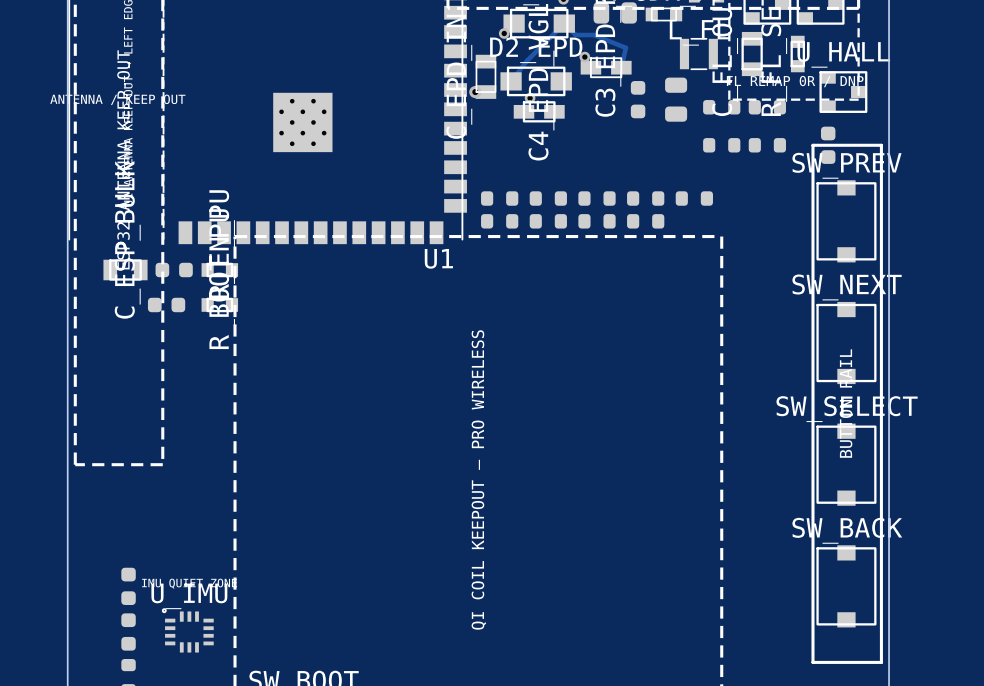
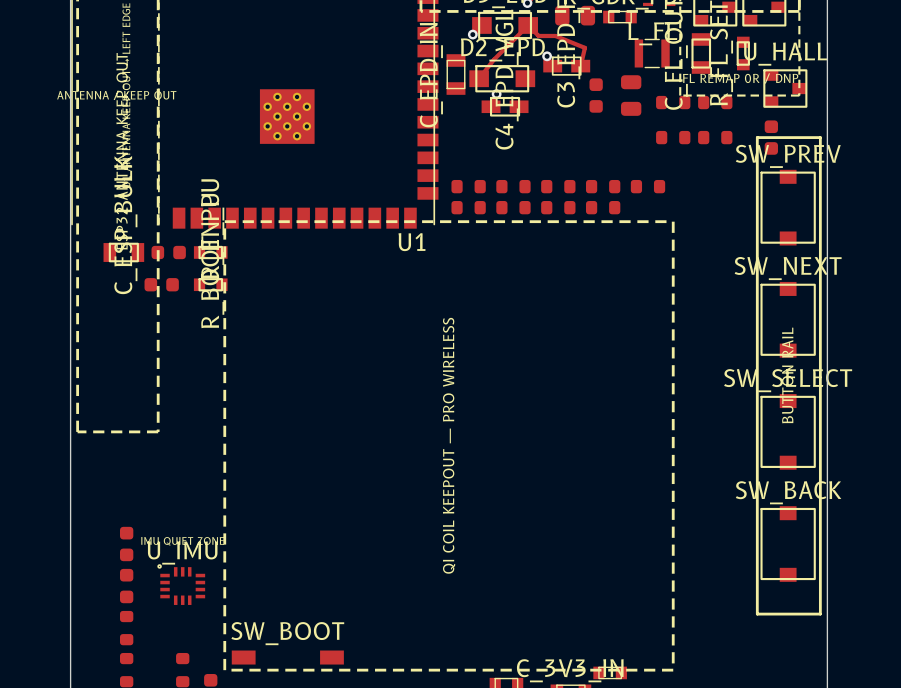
via: (475, 92) -> none

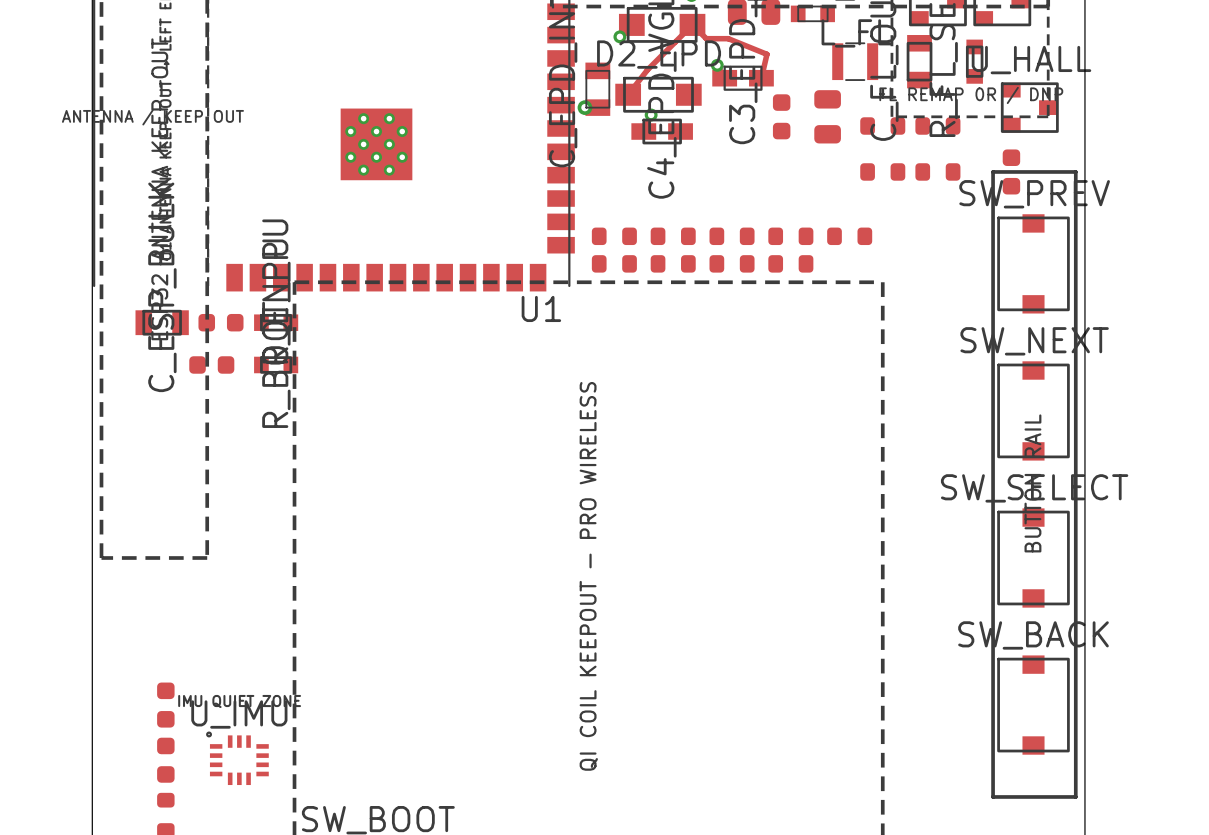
via: none -> (584, 107)

